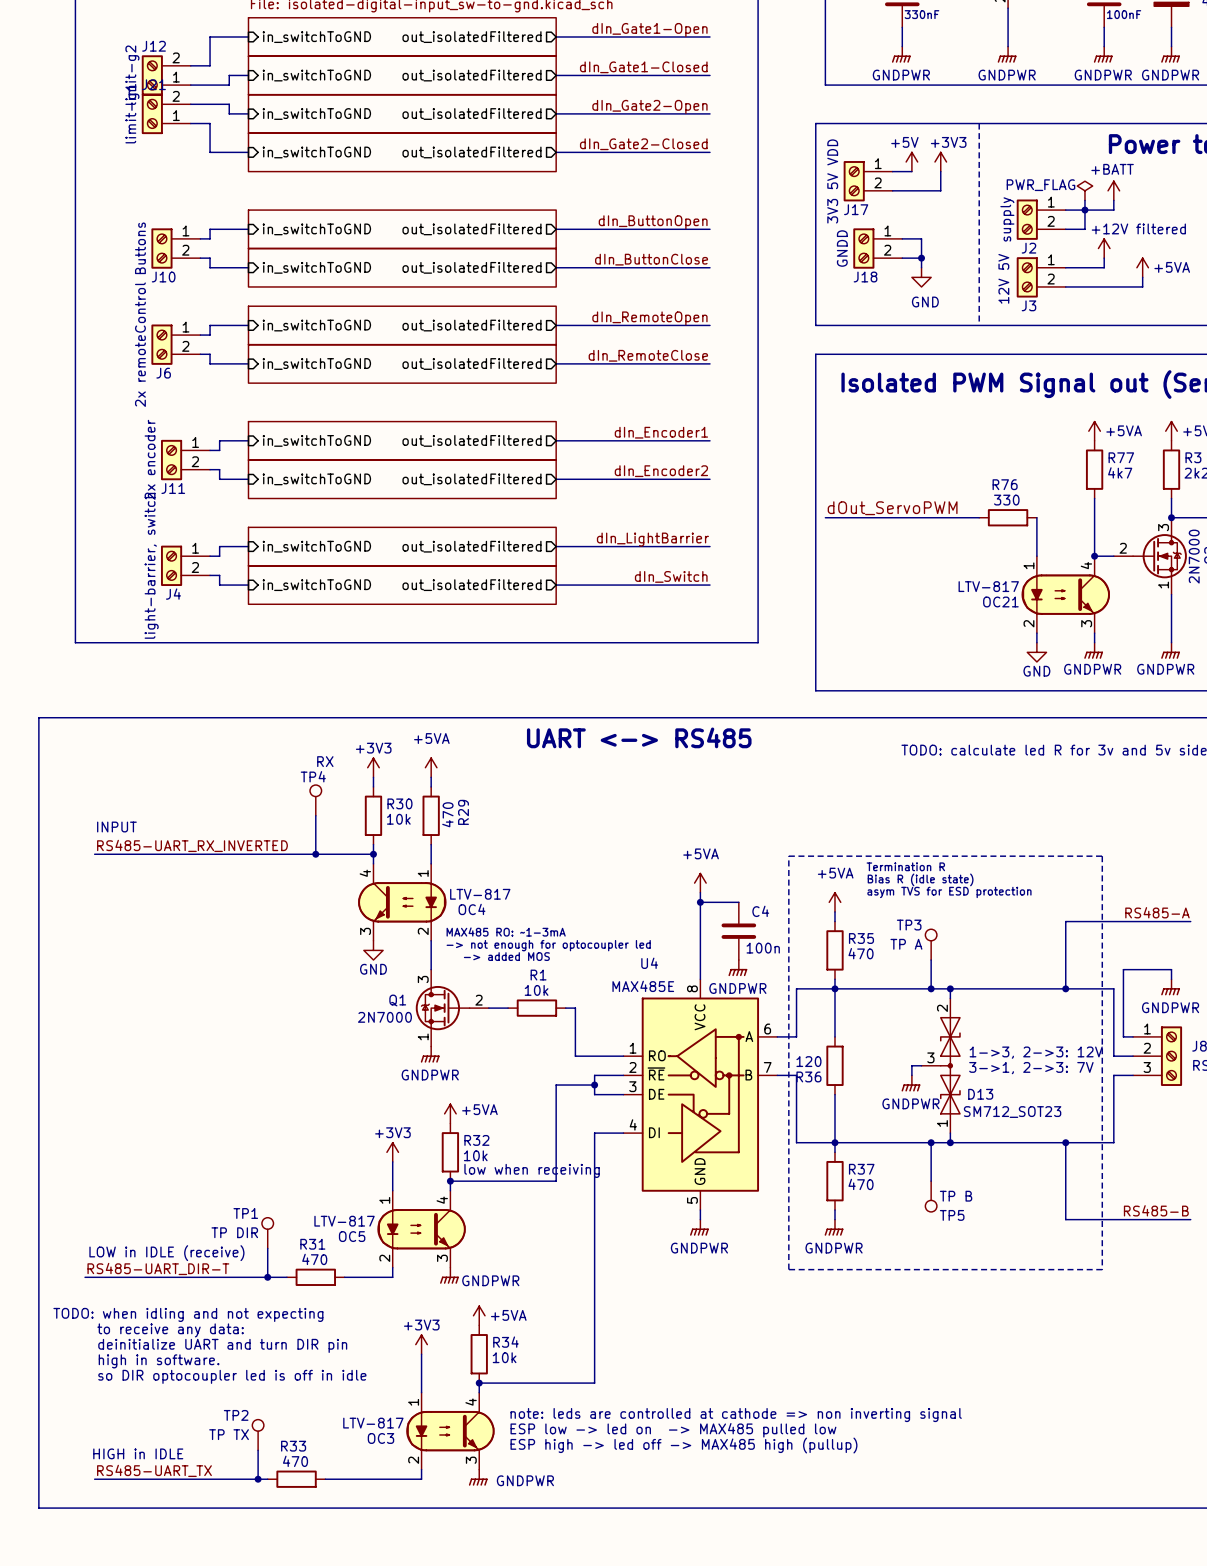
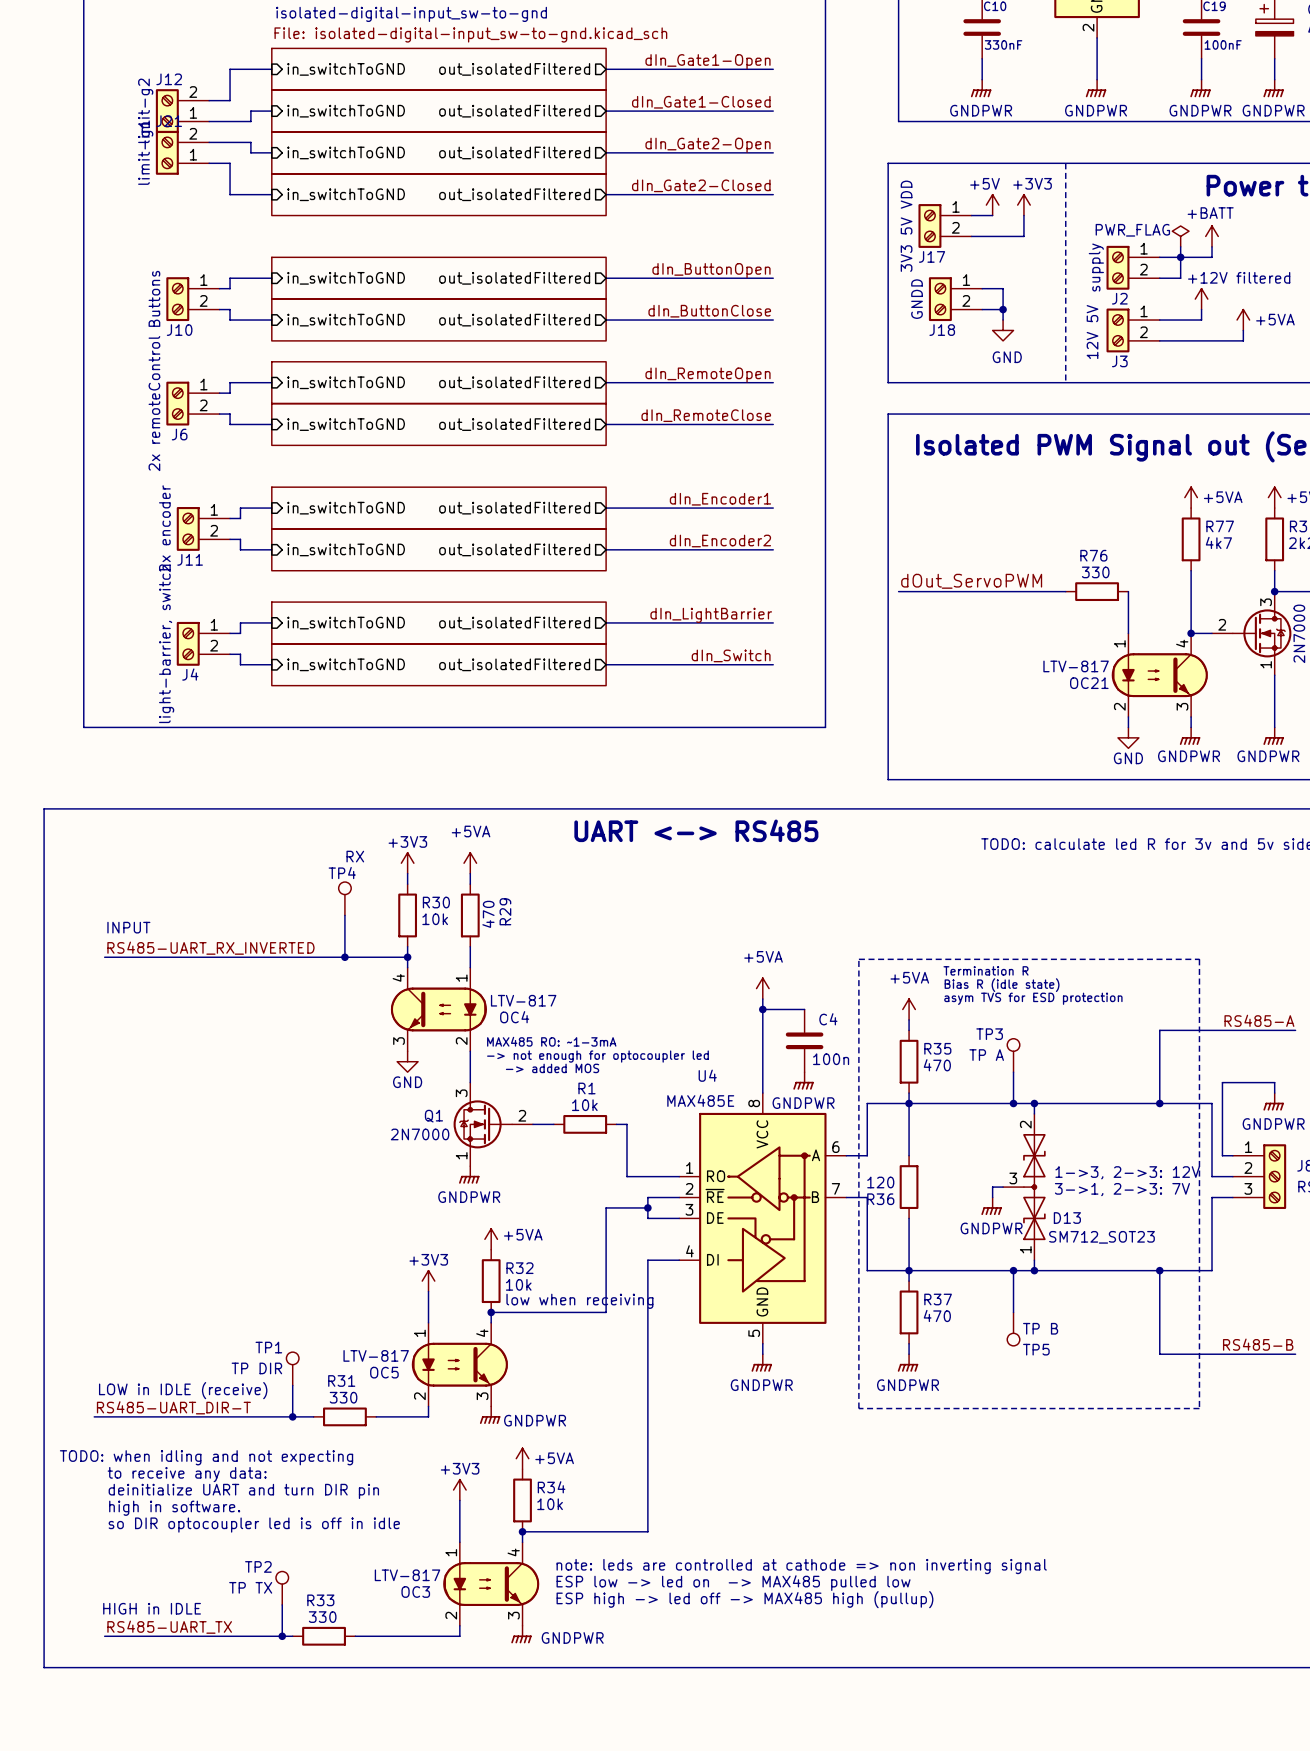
R31 value: 470 (314, 1259) -> 330 (343, 1397)
R33 value: 470 (295, 1461) -> 330 (322, 1617)

